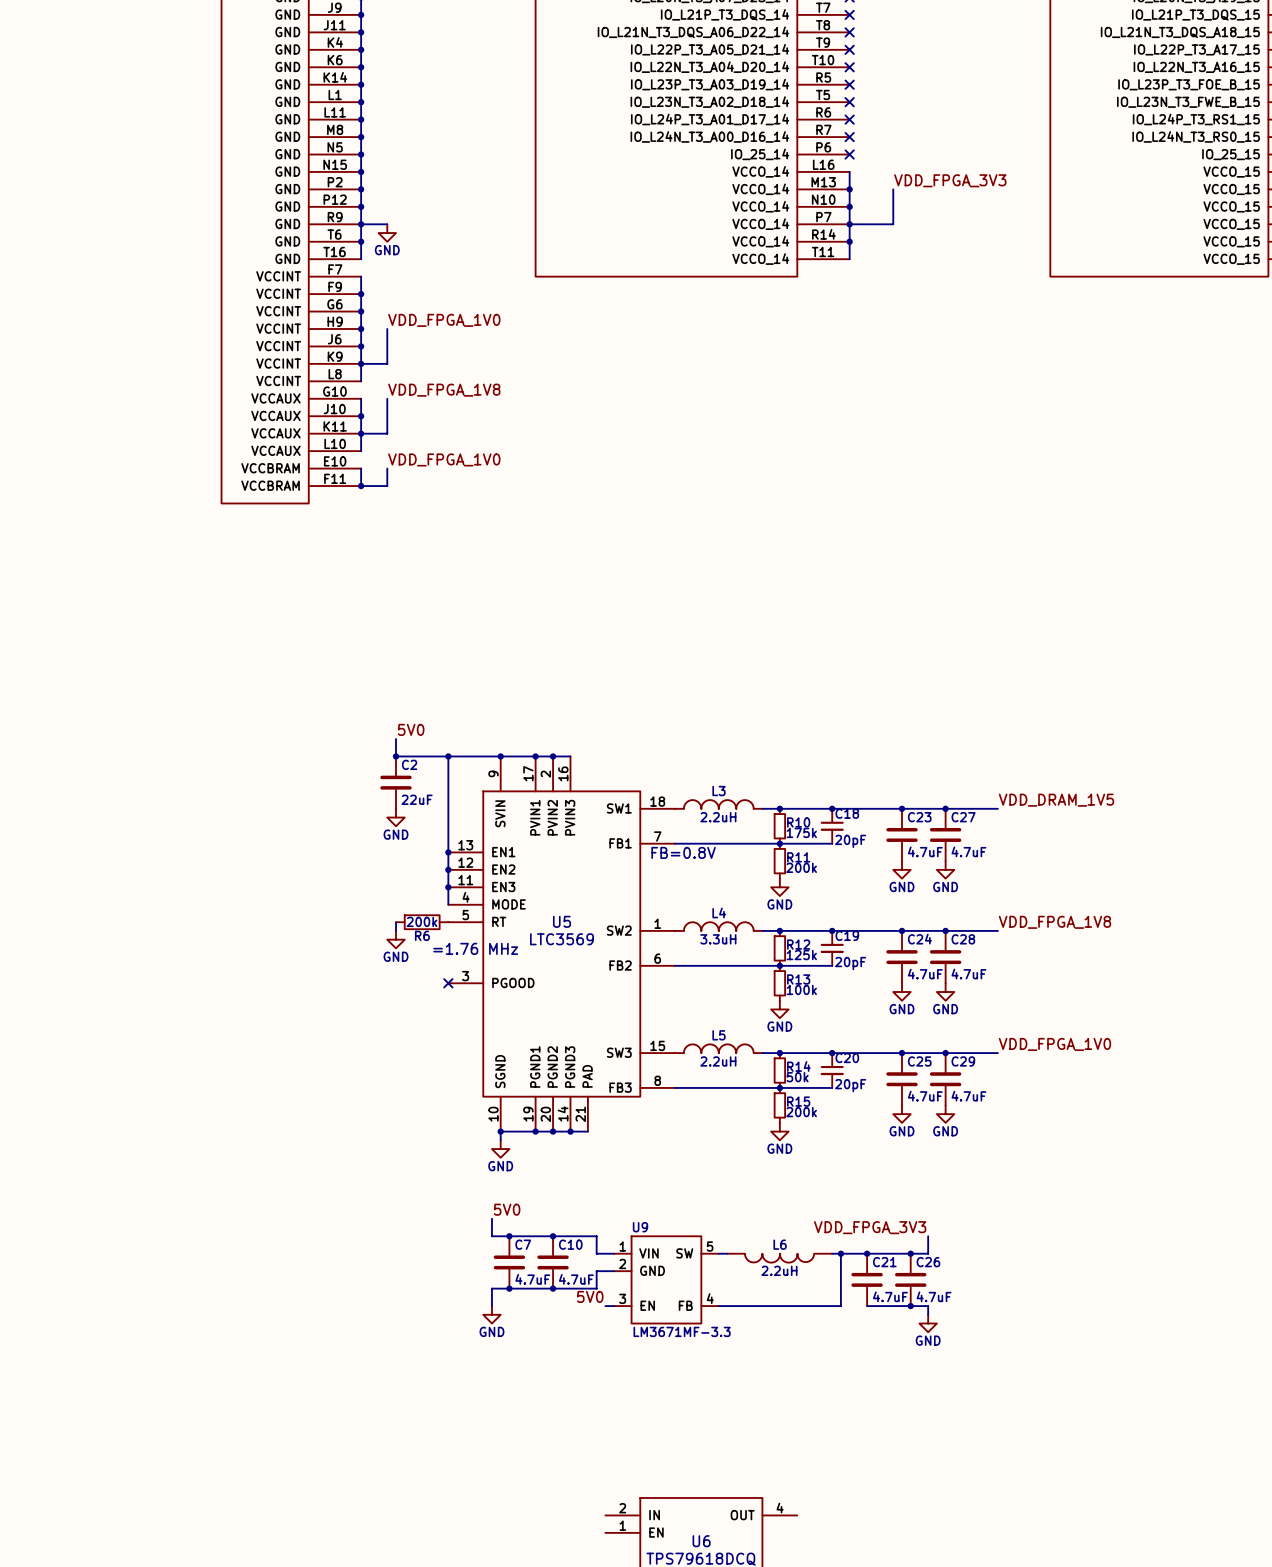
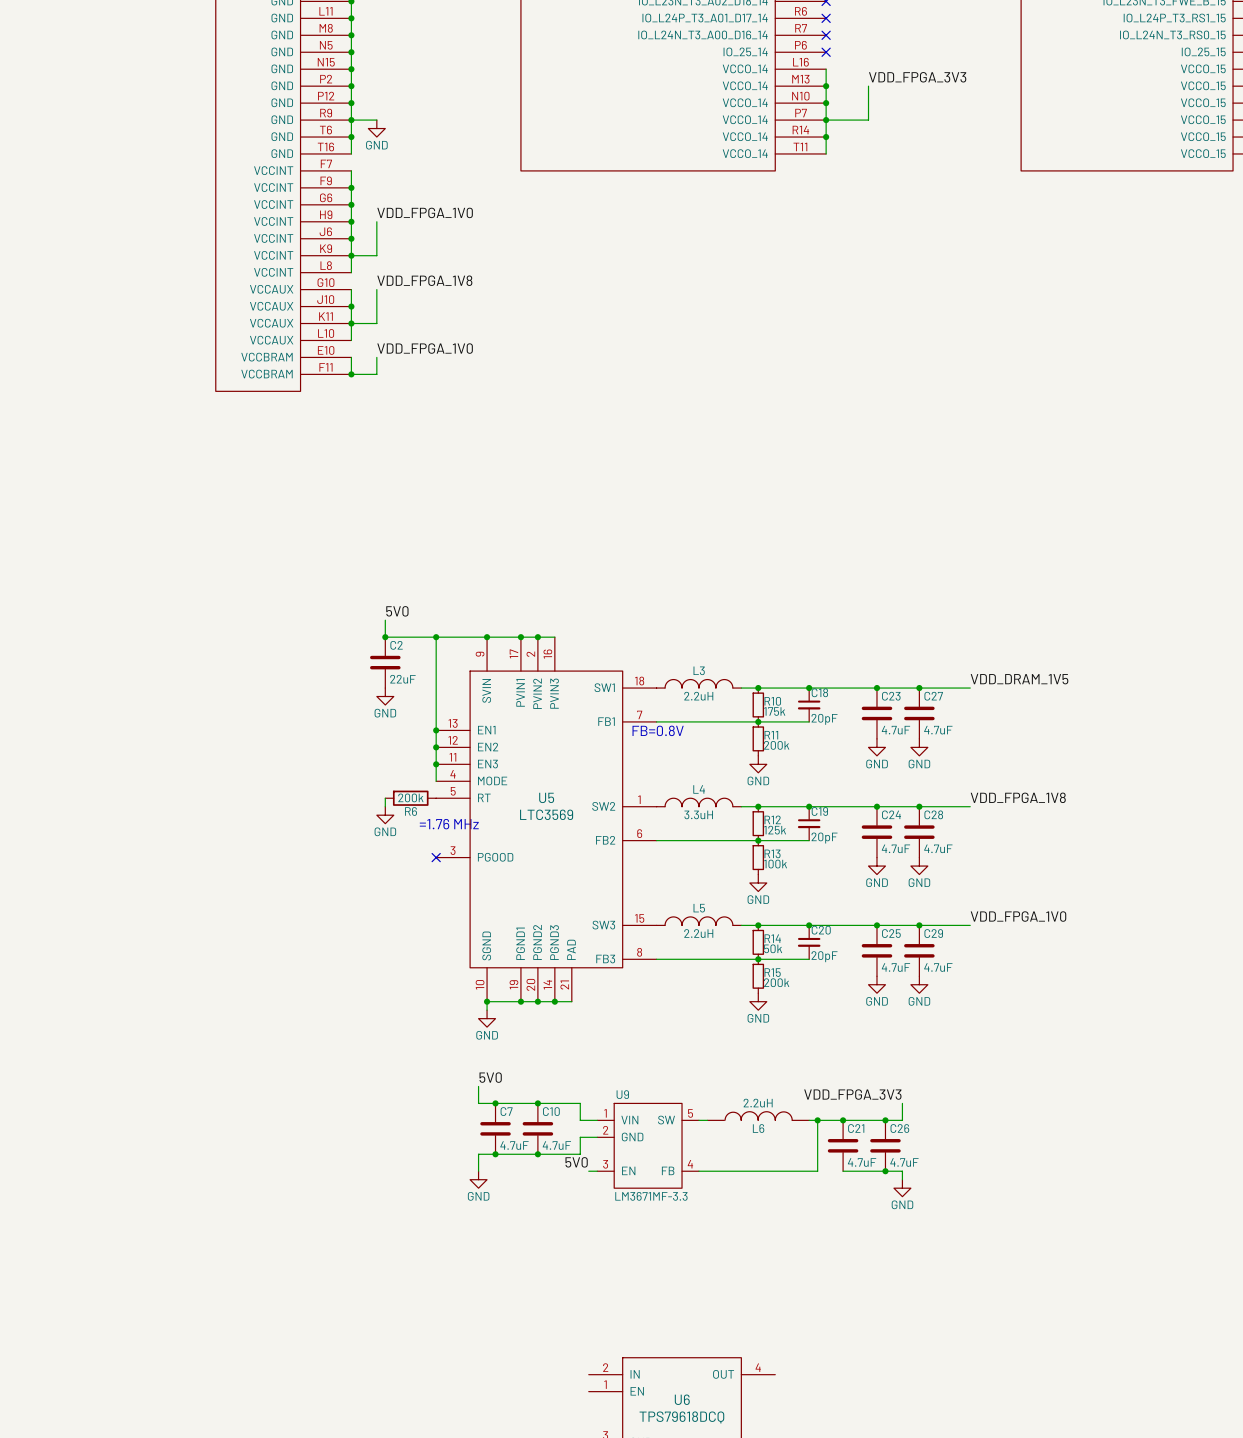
L6 rotation: 0° (779, 1258) -> 180° (758, 1115)

